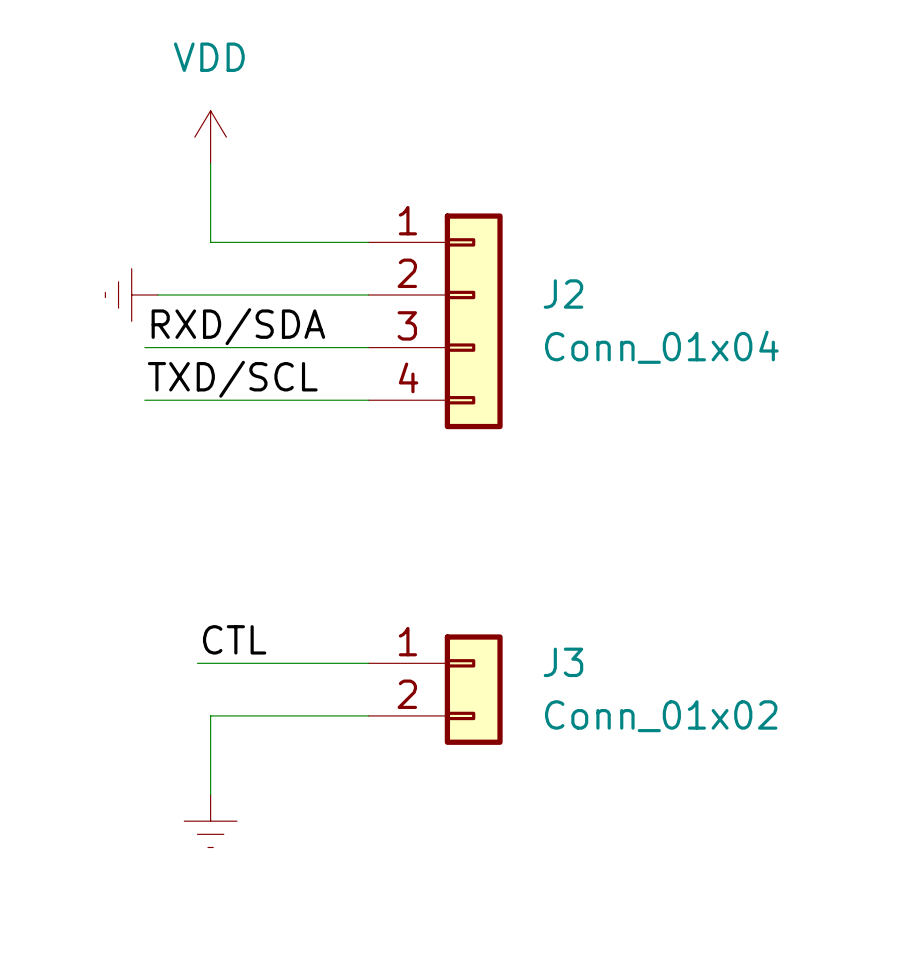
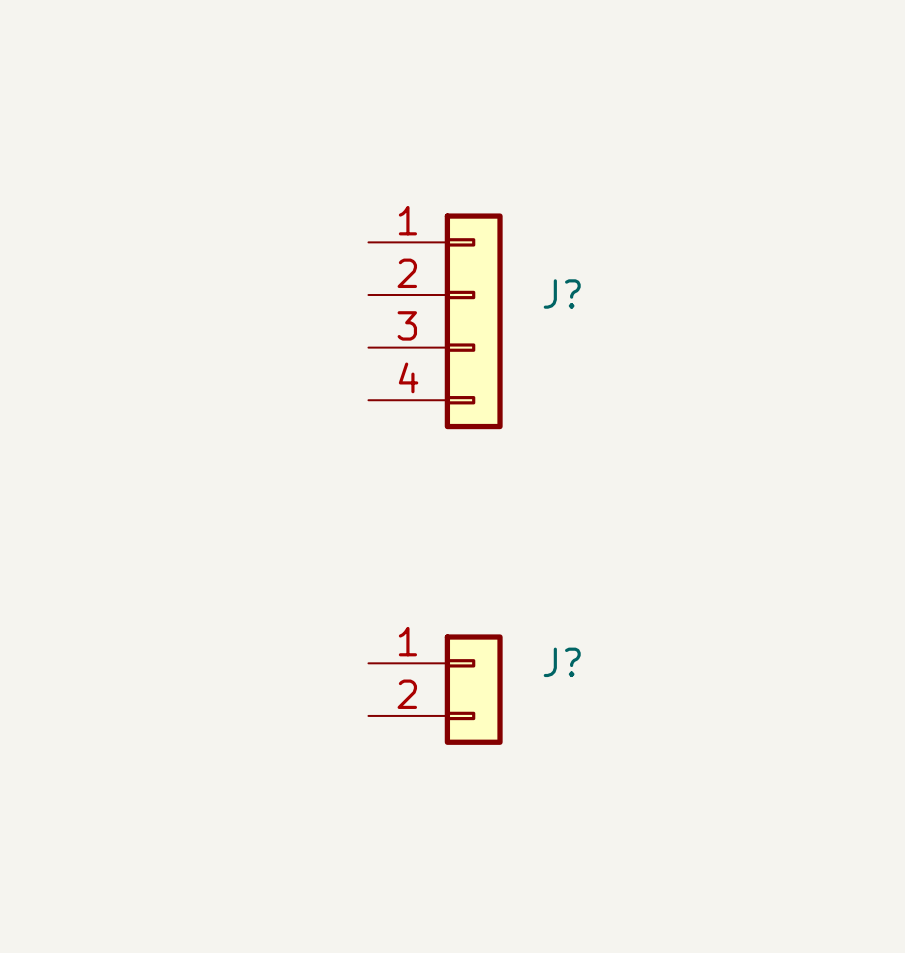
power symbol: VDD (210, 137) -> none
wire: (210, 163) (210, 242) (368, 242) -> none
power symbol: (131, 294) -> none
wire: (157, 294) (368, 294) -> none
J2 name: J2 (563, 294) -> J? (562, 294)
label: RXD/SDA (238, 326) -> none
wire: (144, 347) (368, 347) -> none
J2 value: Conn_01x04 (661, 347) -> none
label: TXD/SCL (232, 379) -> none
wire: (144, 400) (368, 400) -> none
label: CTL (234, 639) -> none
J3 name: J3 (563, 662) -> J? (562, 662)
wire: (197, 663) (368, 663) -> none
wire: (368, 715) (210, 715) (210, 794) -> none
J3 value: Conn_01x02 (661, 716) -> none
power symbol: (210, 821) -> none

